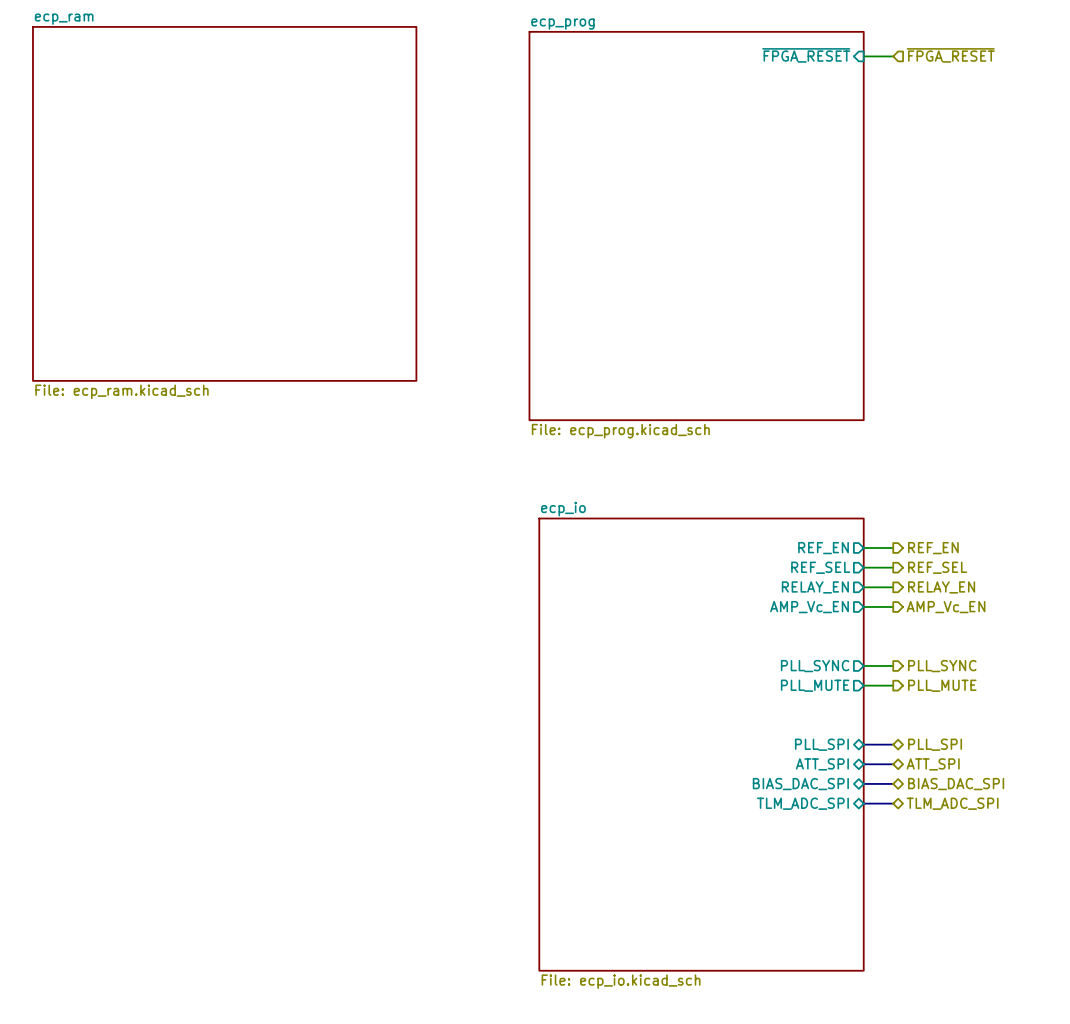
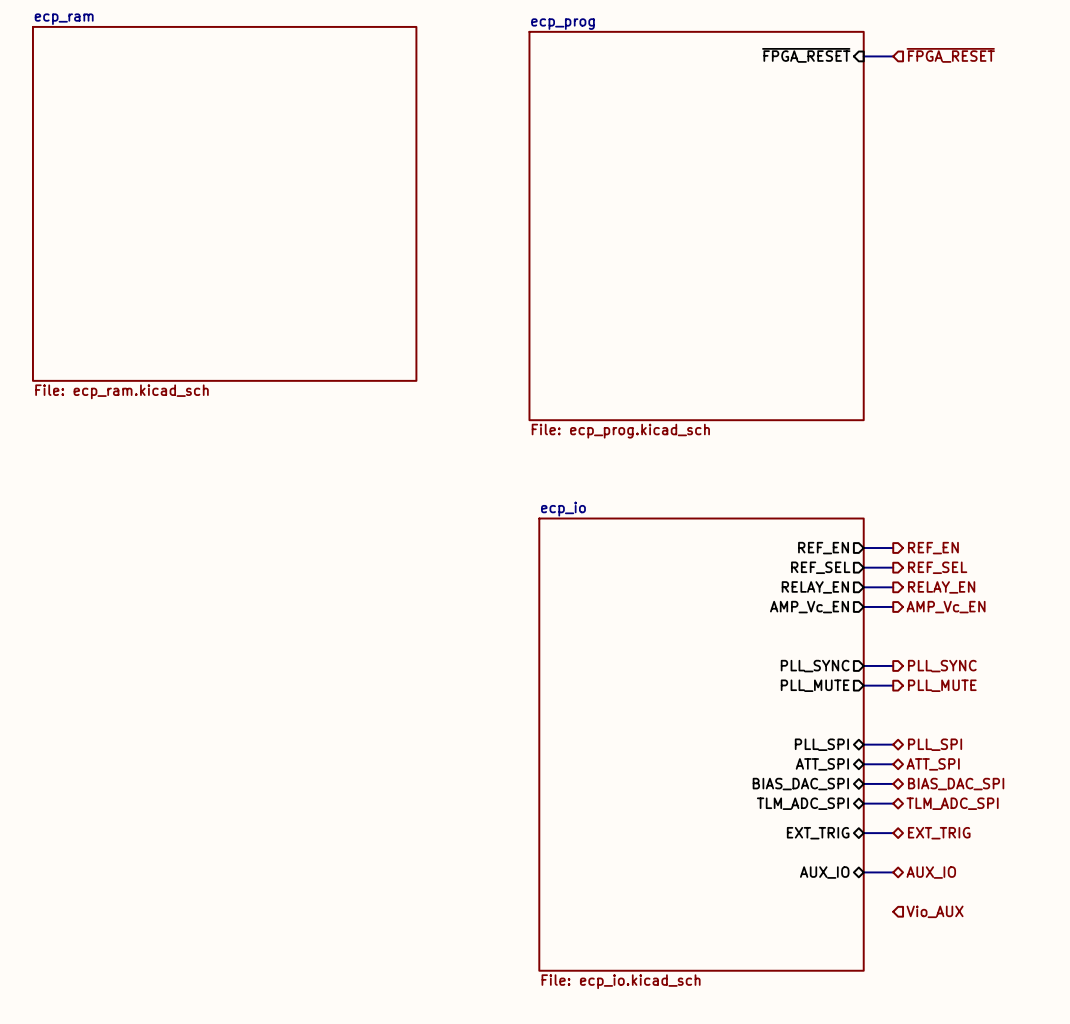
sheet pin: none -> EXT_TRIG (818, 833)
wire: none -> (863, 833) (893, 833)
hierarchical label: none -> EXT_TRIG (939, 833)
sheet pin: none -> AUX_IO (824, 872)
wire: none -> (863, 872) (893, 872)
hierarchical label: none -> AUX_IO (931, 872)
hierarchical label: none -> Vio_AUX (935, 911)

